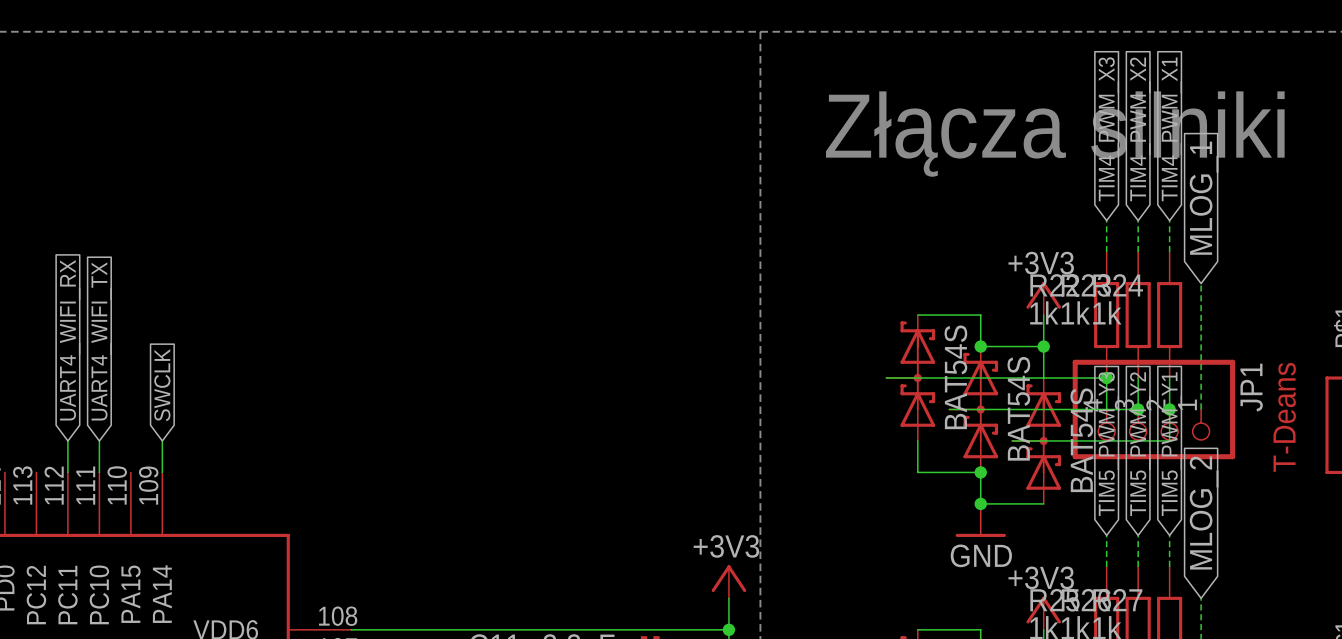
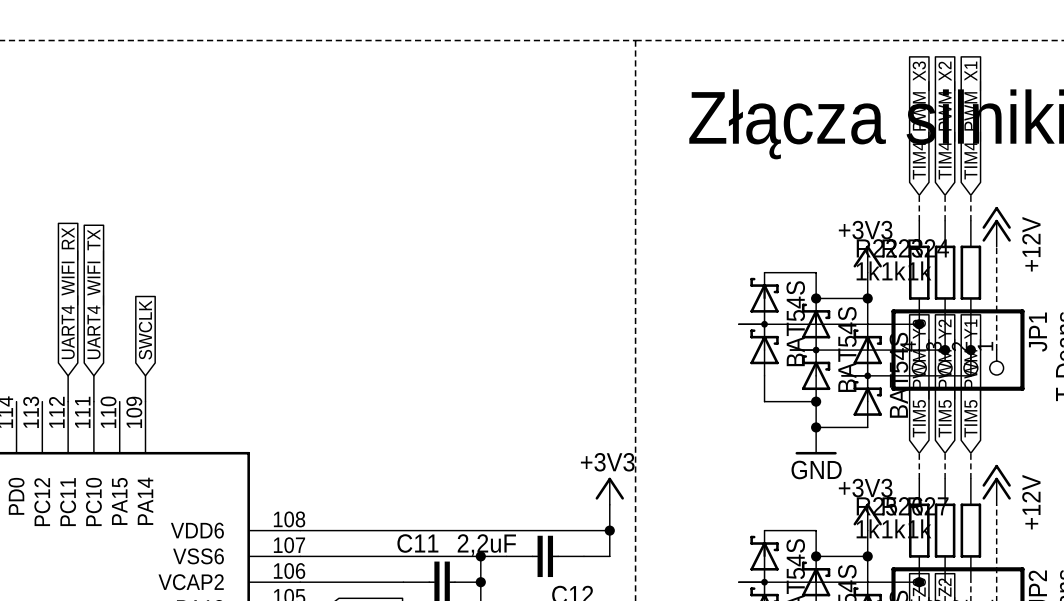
global label: MLOG_1 (1204, 198) -> none
power symbol: none -> +12V (996, 226)
global label: MLOG_2 (1204, 512) -> none
power symbol: none -> +12V (996, 484)

